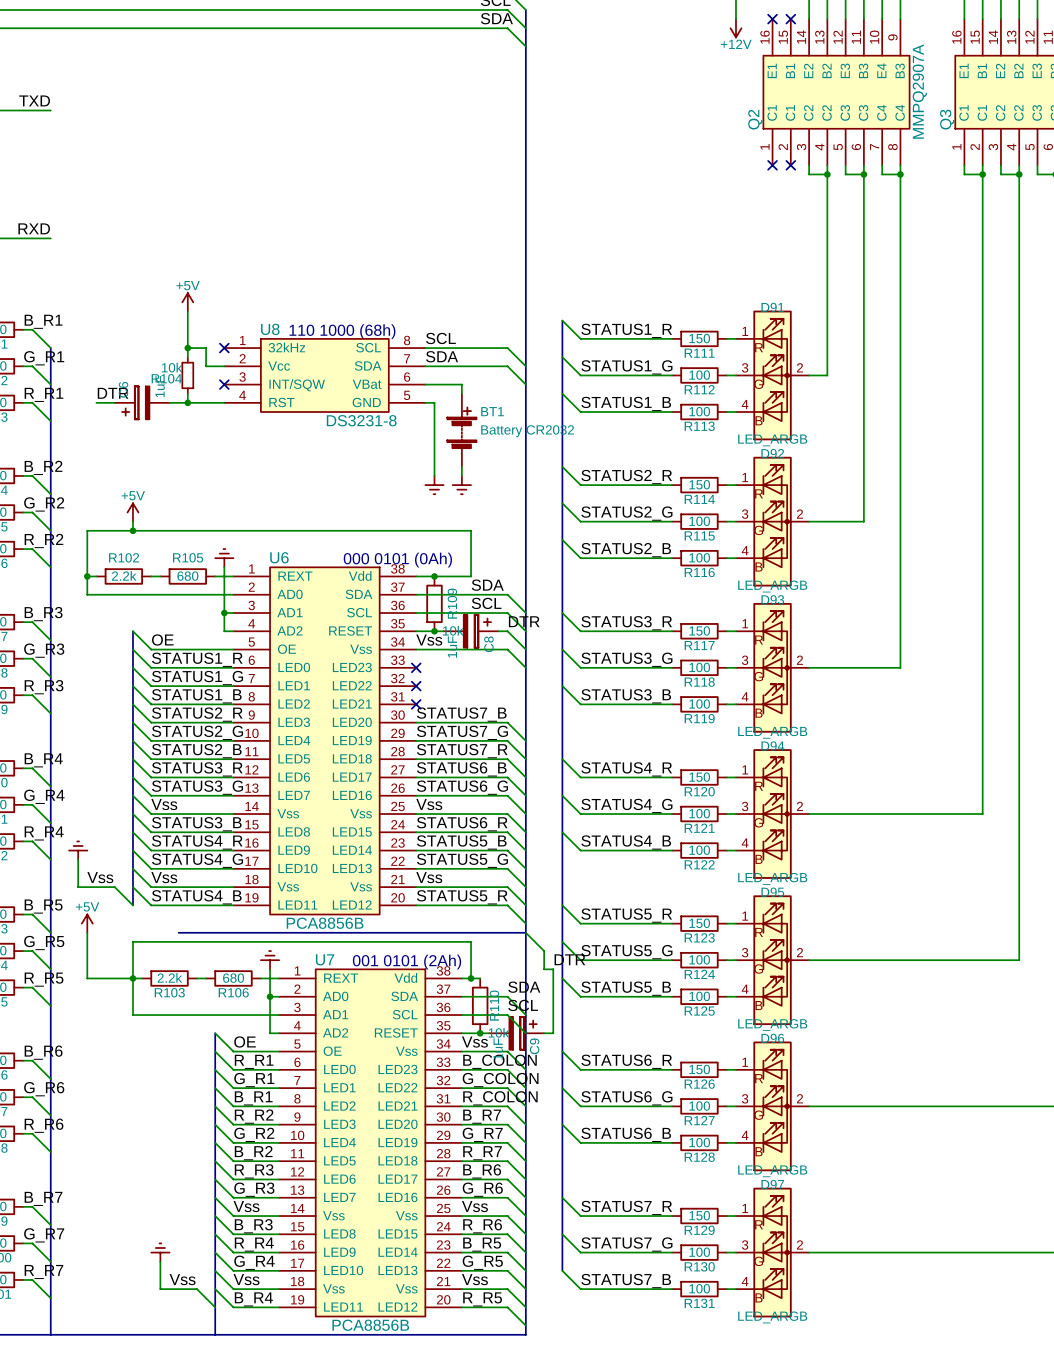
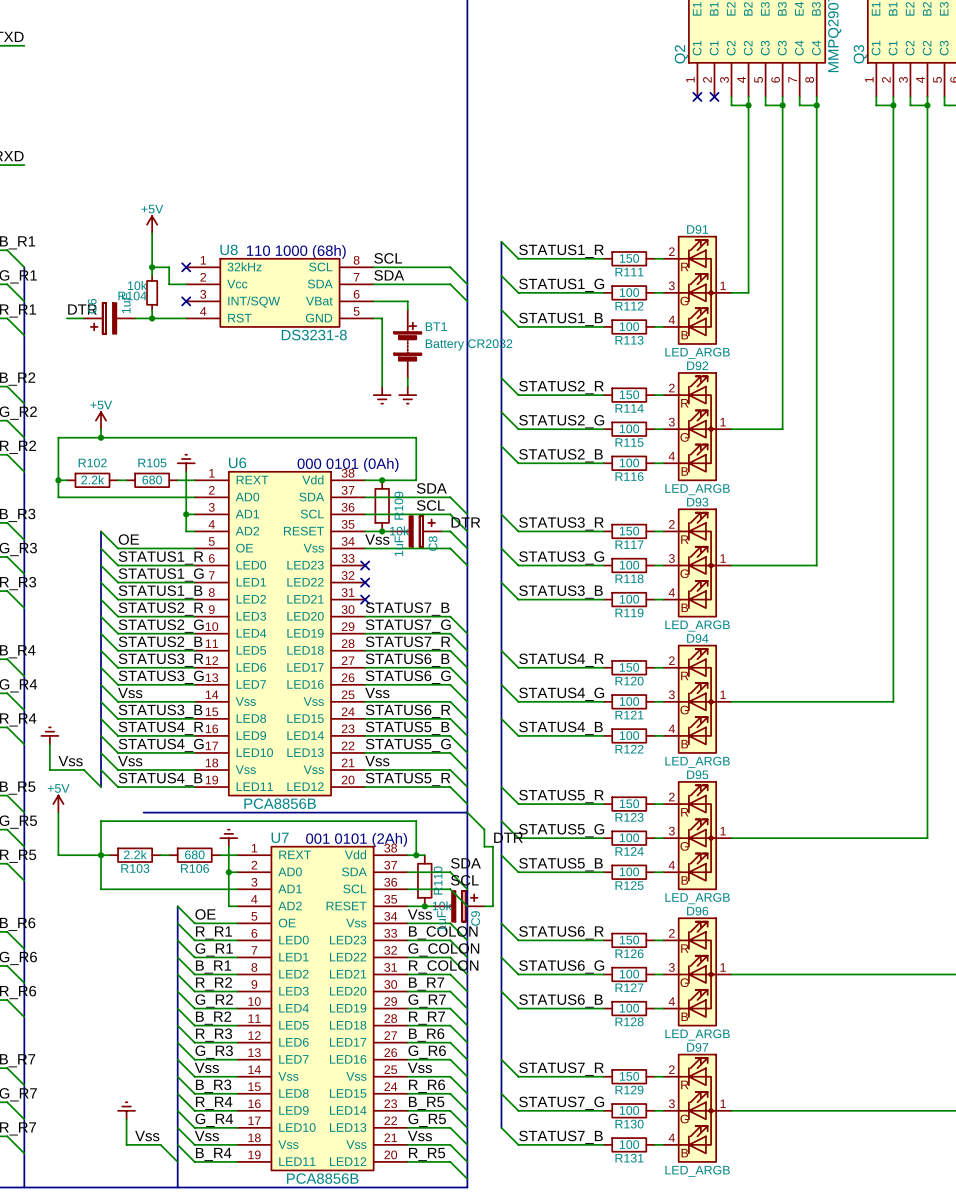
D91 symbol: [735, 310, 810, 441] -> [663, 235, 732, 345]
D92 symbol: [735, 456, 810, 587] -> [663, 372, 732, 482]
D93 symbol: [735, 602, 810, 733] -> [663, 508, 732, 618]
D94 symbol: [735, 749, 810, 879] -> [663, 644, 732, 754]
D95 symbol: [735, 895, 810, 1026] -> [663, 781, 732, 891]
D96 symbol: [735, 1041, 810, 1172] -> [663, 917, 732, 1027]
D97 symbol: [735, 1187, 810, 1318] -> [663, 1053, 732, 1163]

